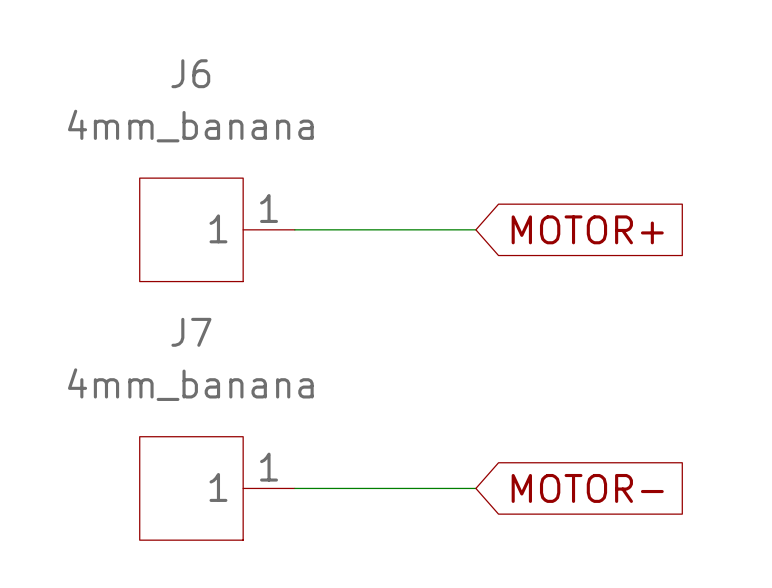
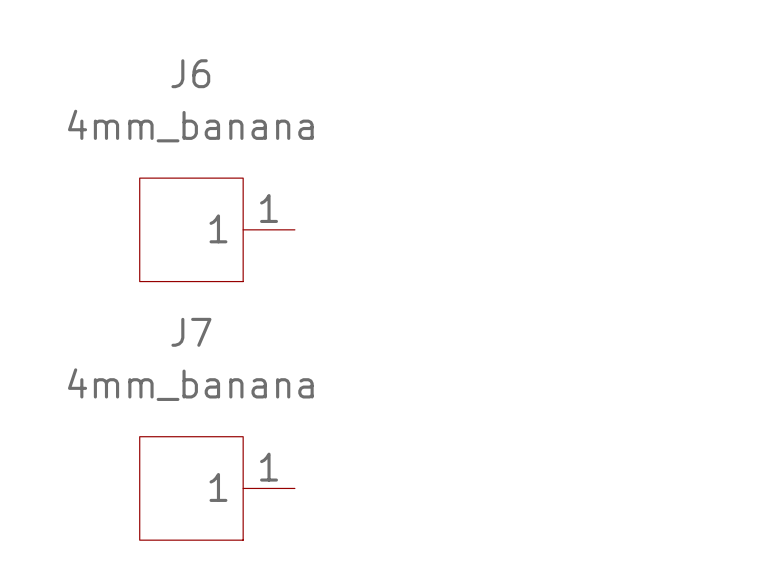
wire: (294, 229) (475, 229) -> none
global label: MOTOR+ (587, 229) -> none
wire: (294, 488) (475, 488) -> none
global label: MOTOR- (587, 488) -> none

